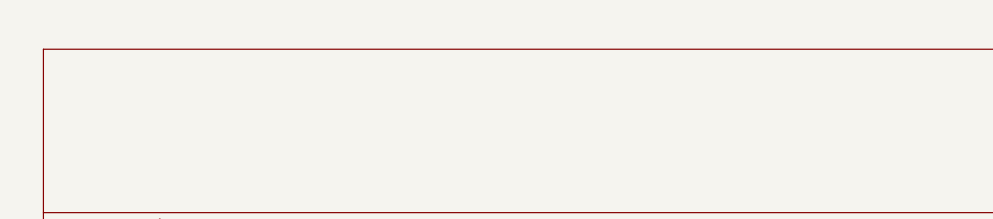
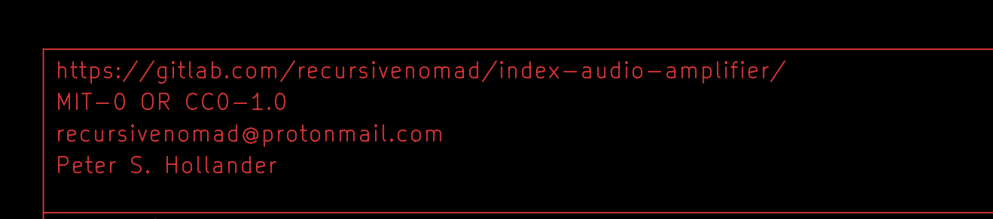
title block: none -> https://gitlab.com/recursivenomad/index-audio-amplifier/ (421, 71)
title block: none -> MIT-0 OR CC0-1.0 (171, 101)
title block: none -> recursivenomad@protonmail.com (249, 135)
title block: none -> Peter S. Hollander (167, 164)

